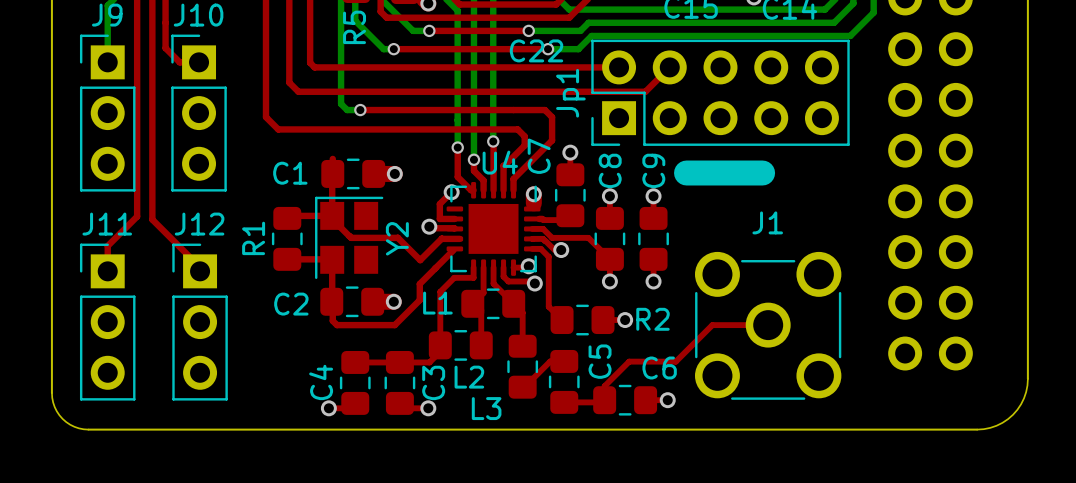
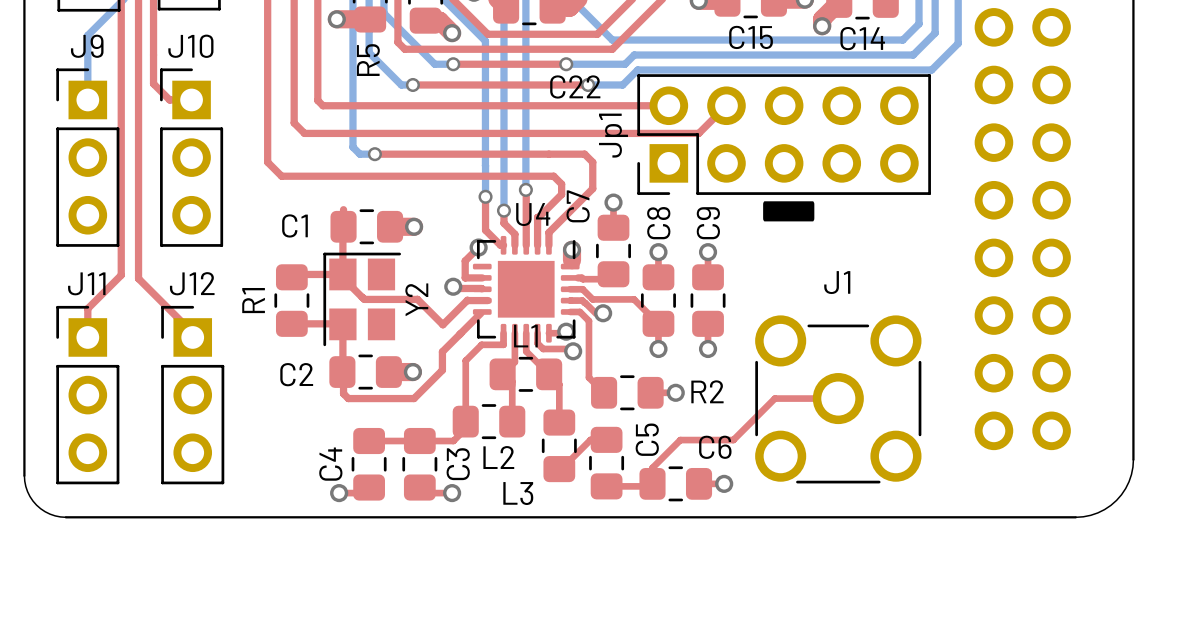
L1 name position: L1 (437, 303) -> L1 (525, 336)

